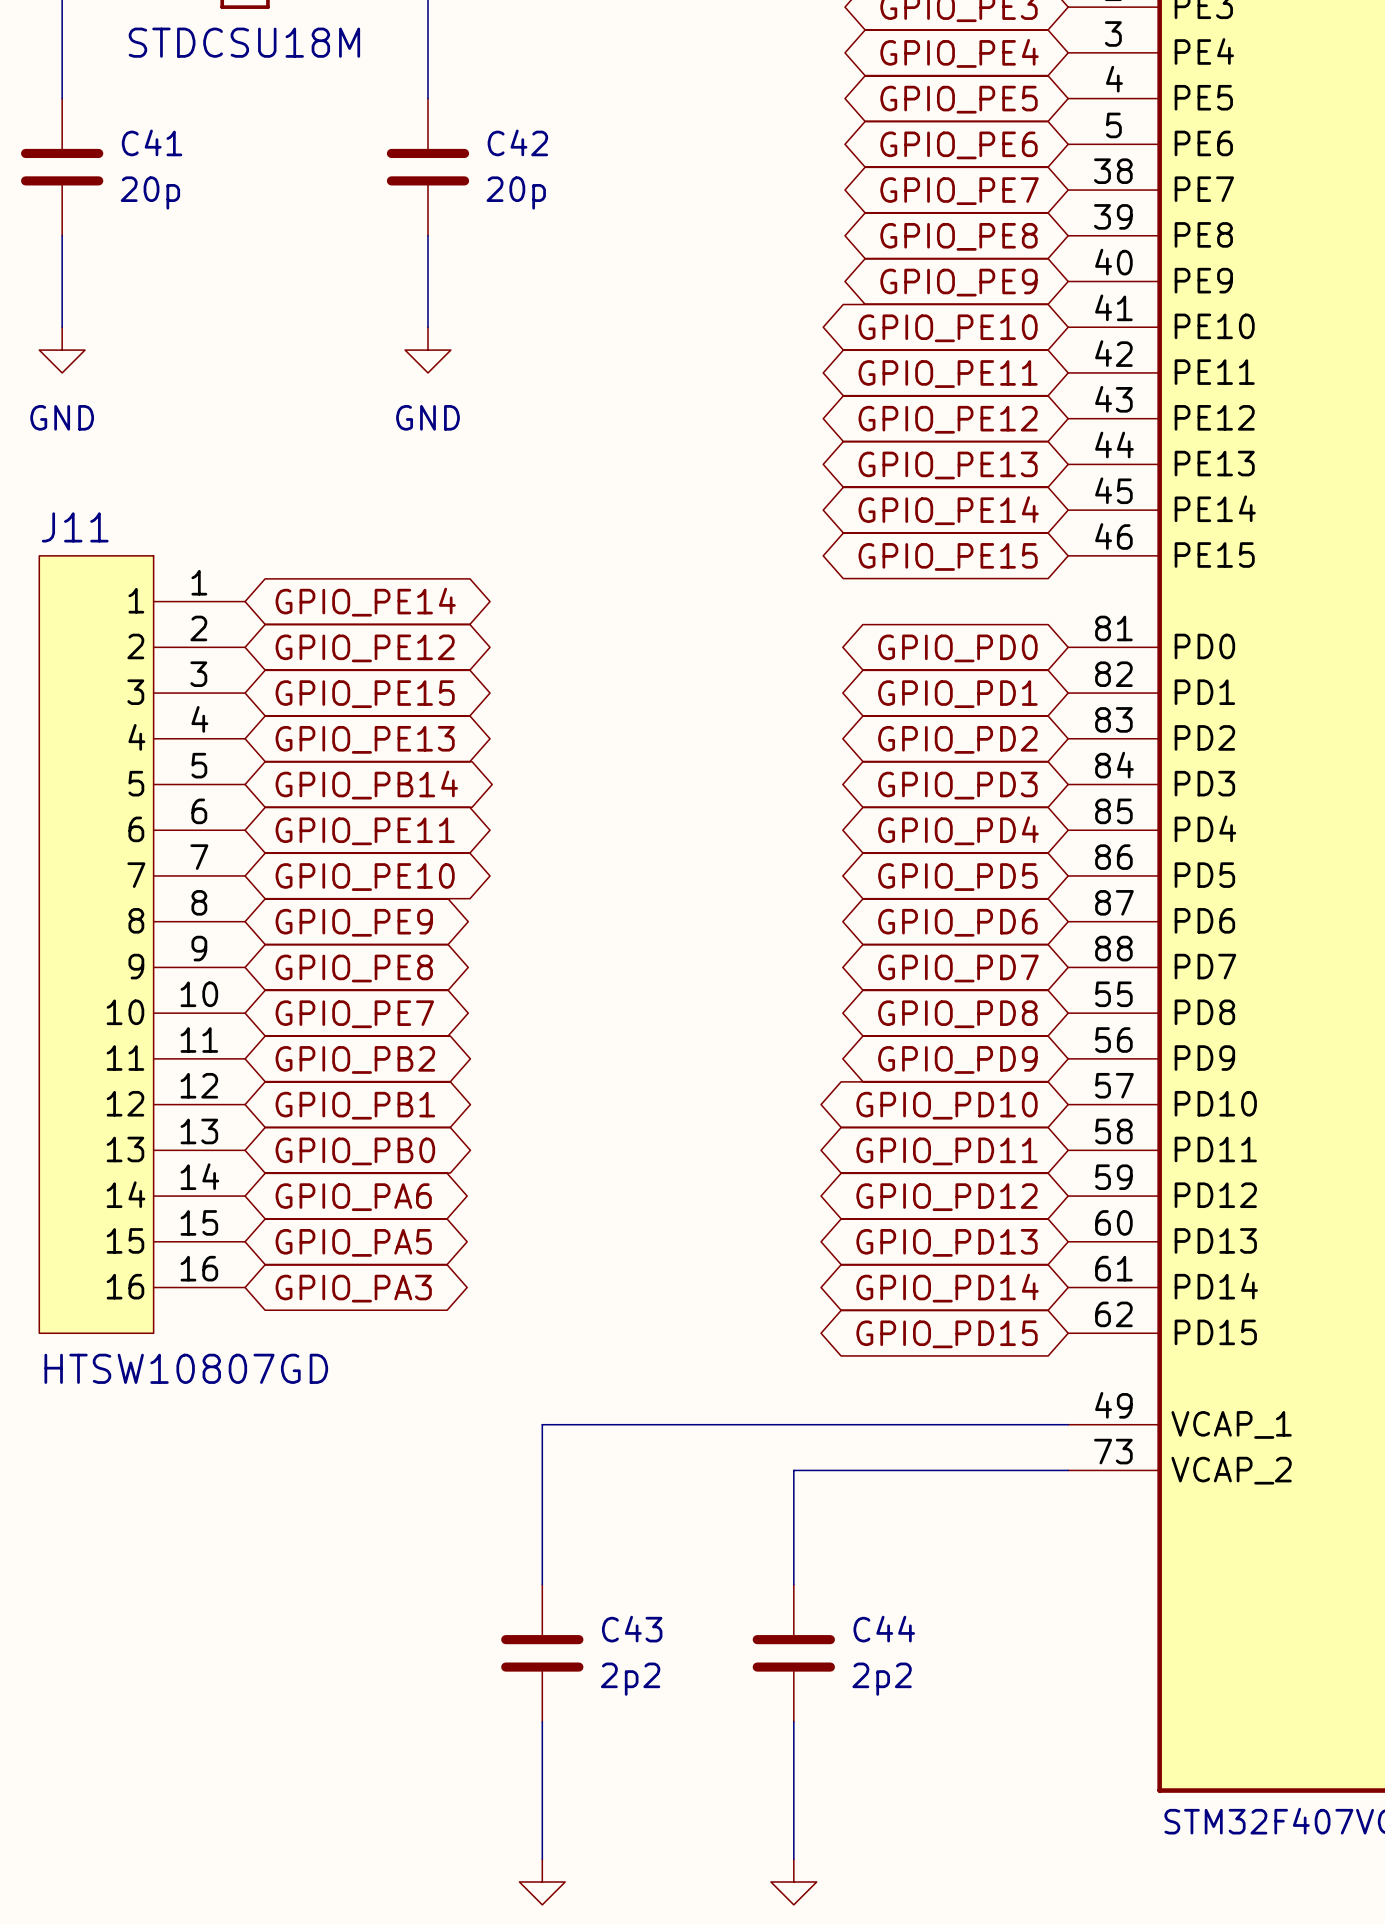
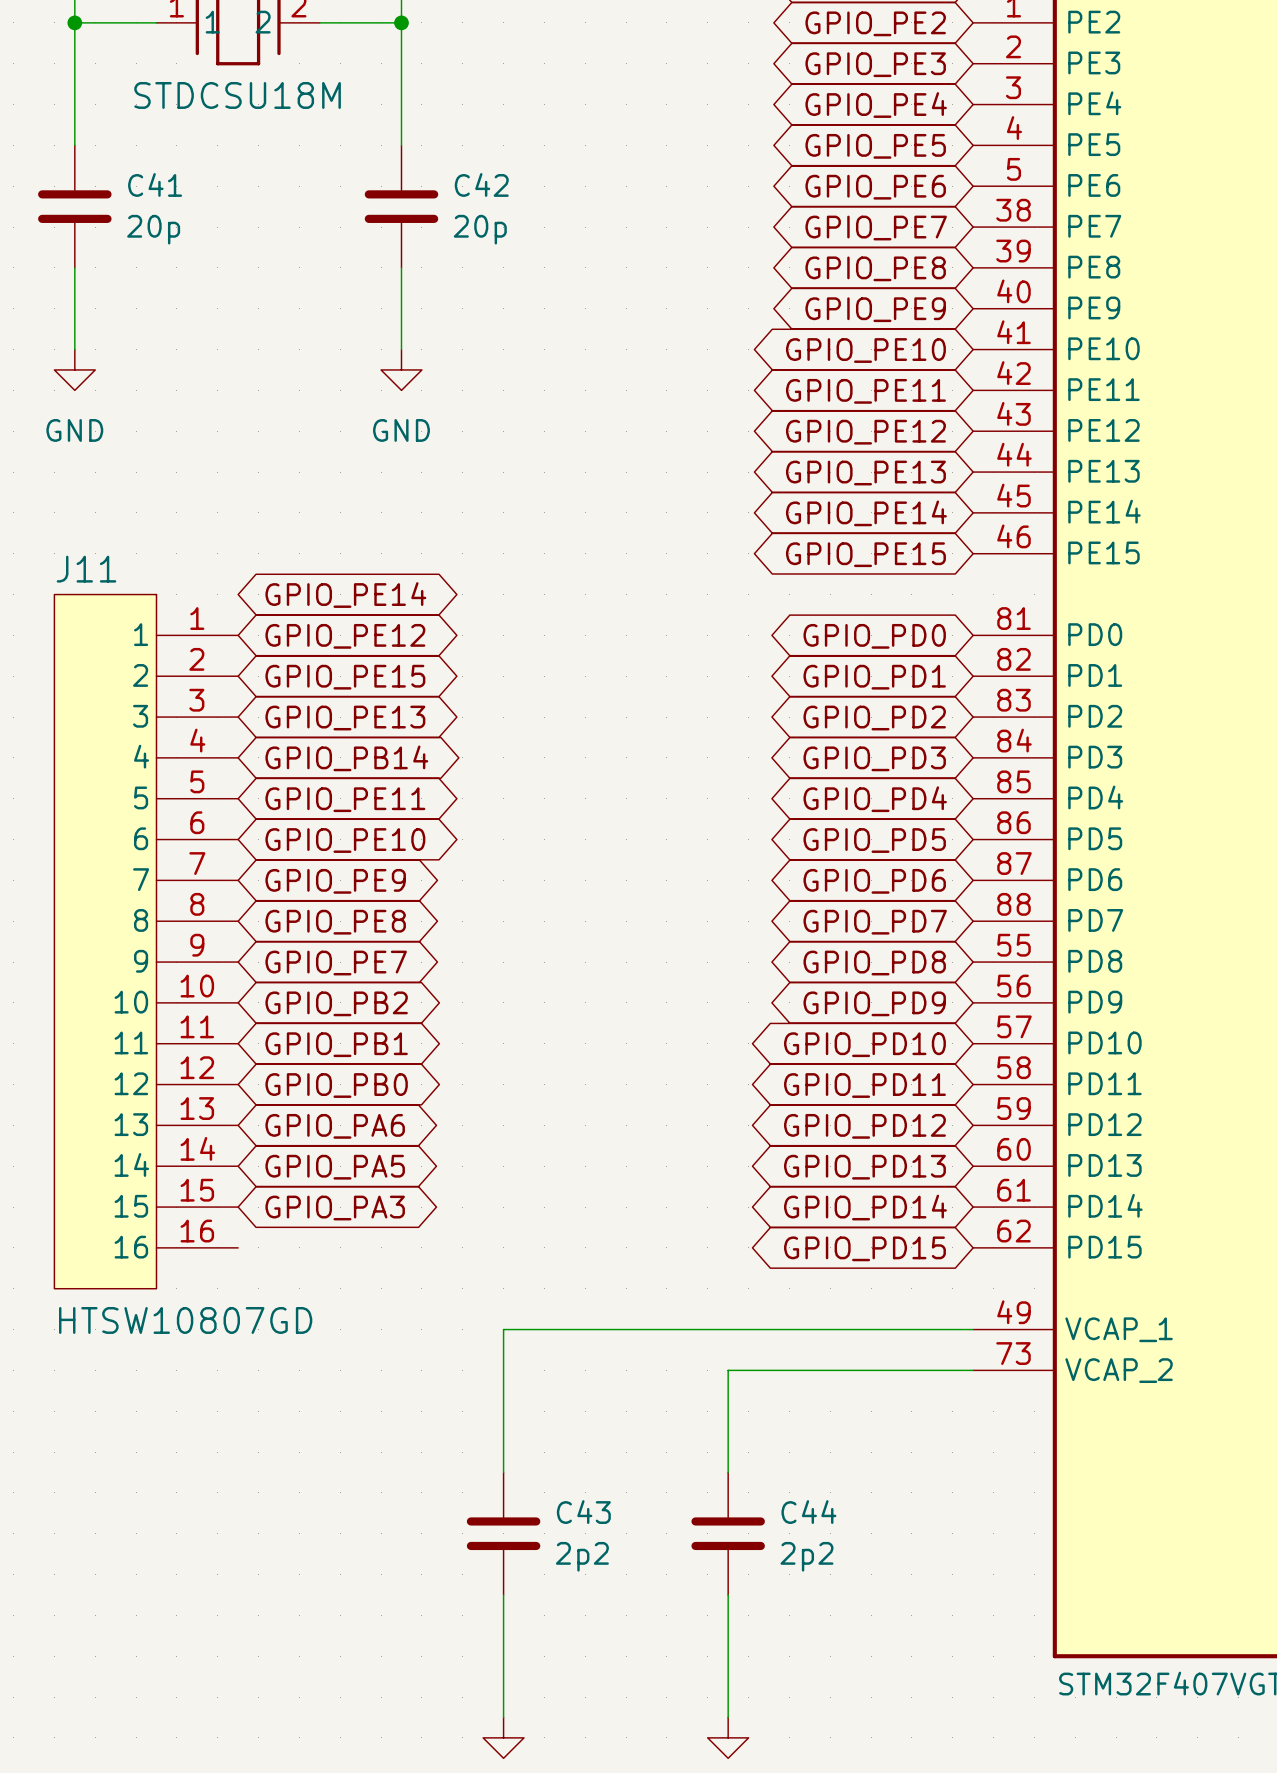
J11 position: (142, 944) -> (146, 941)

